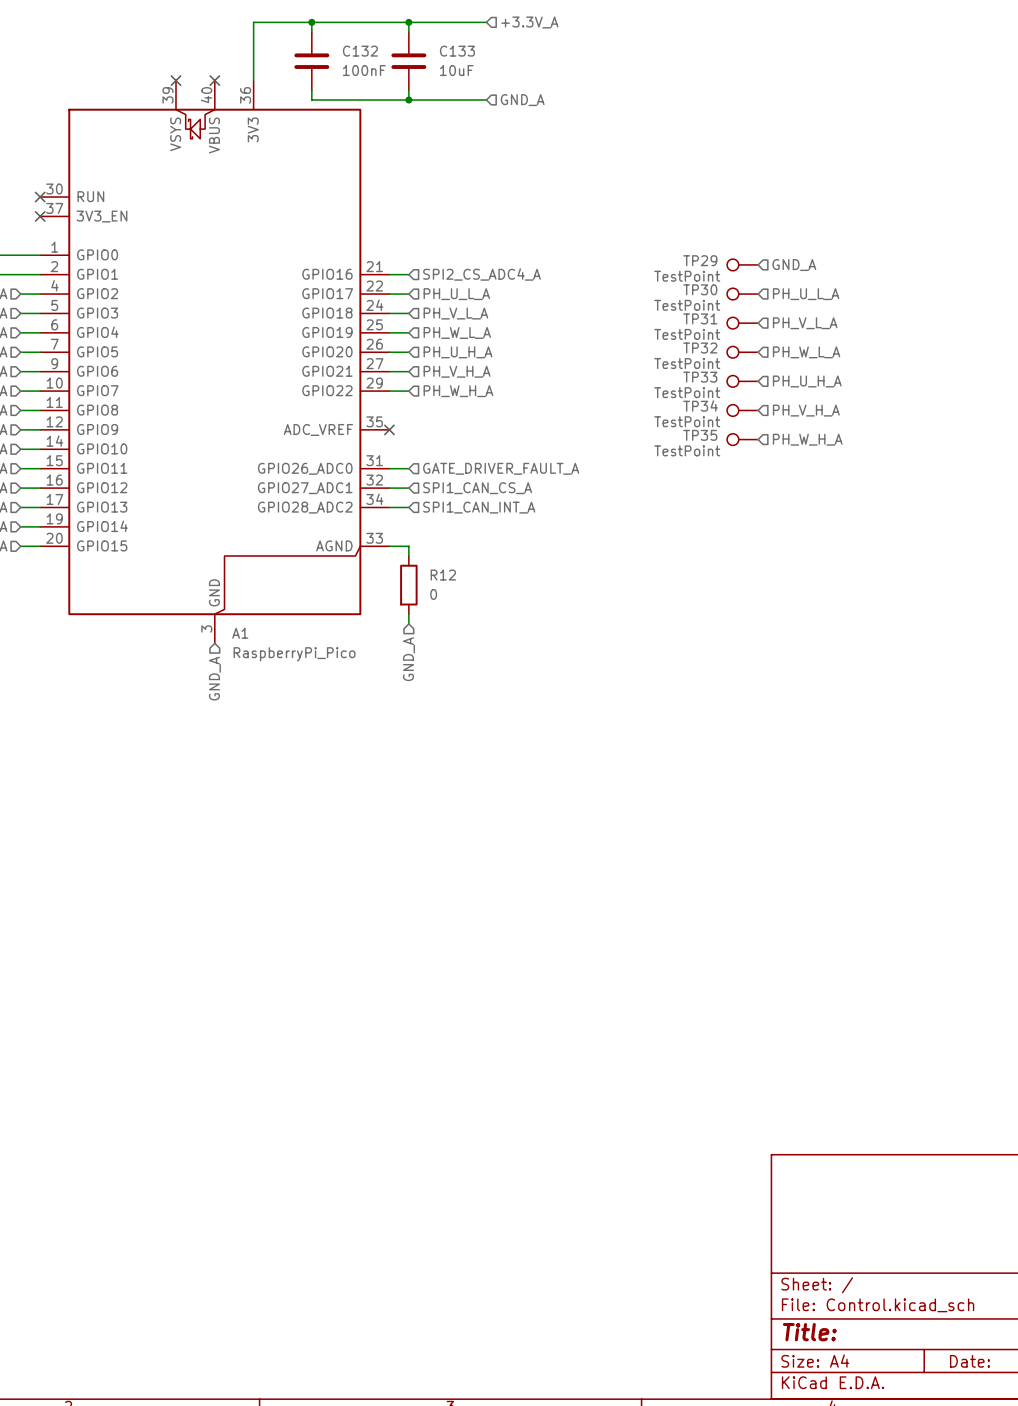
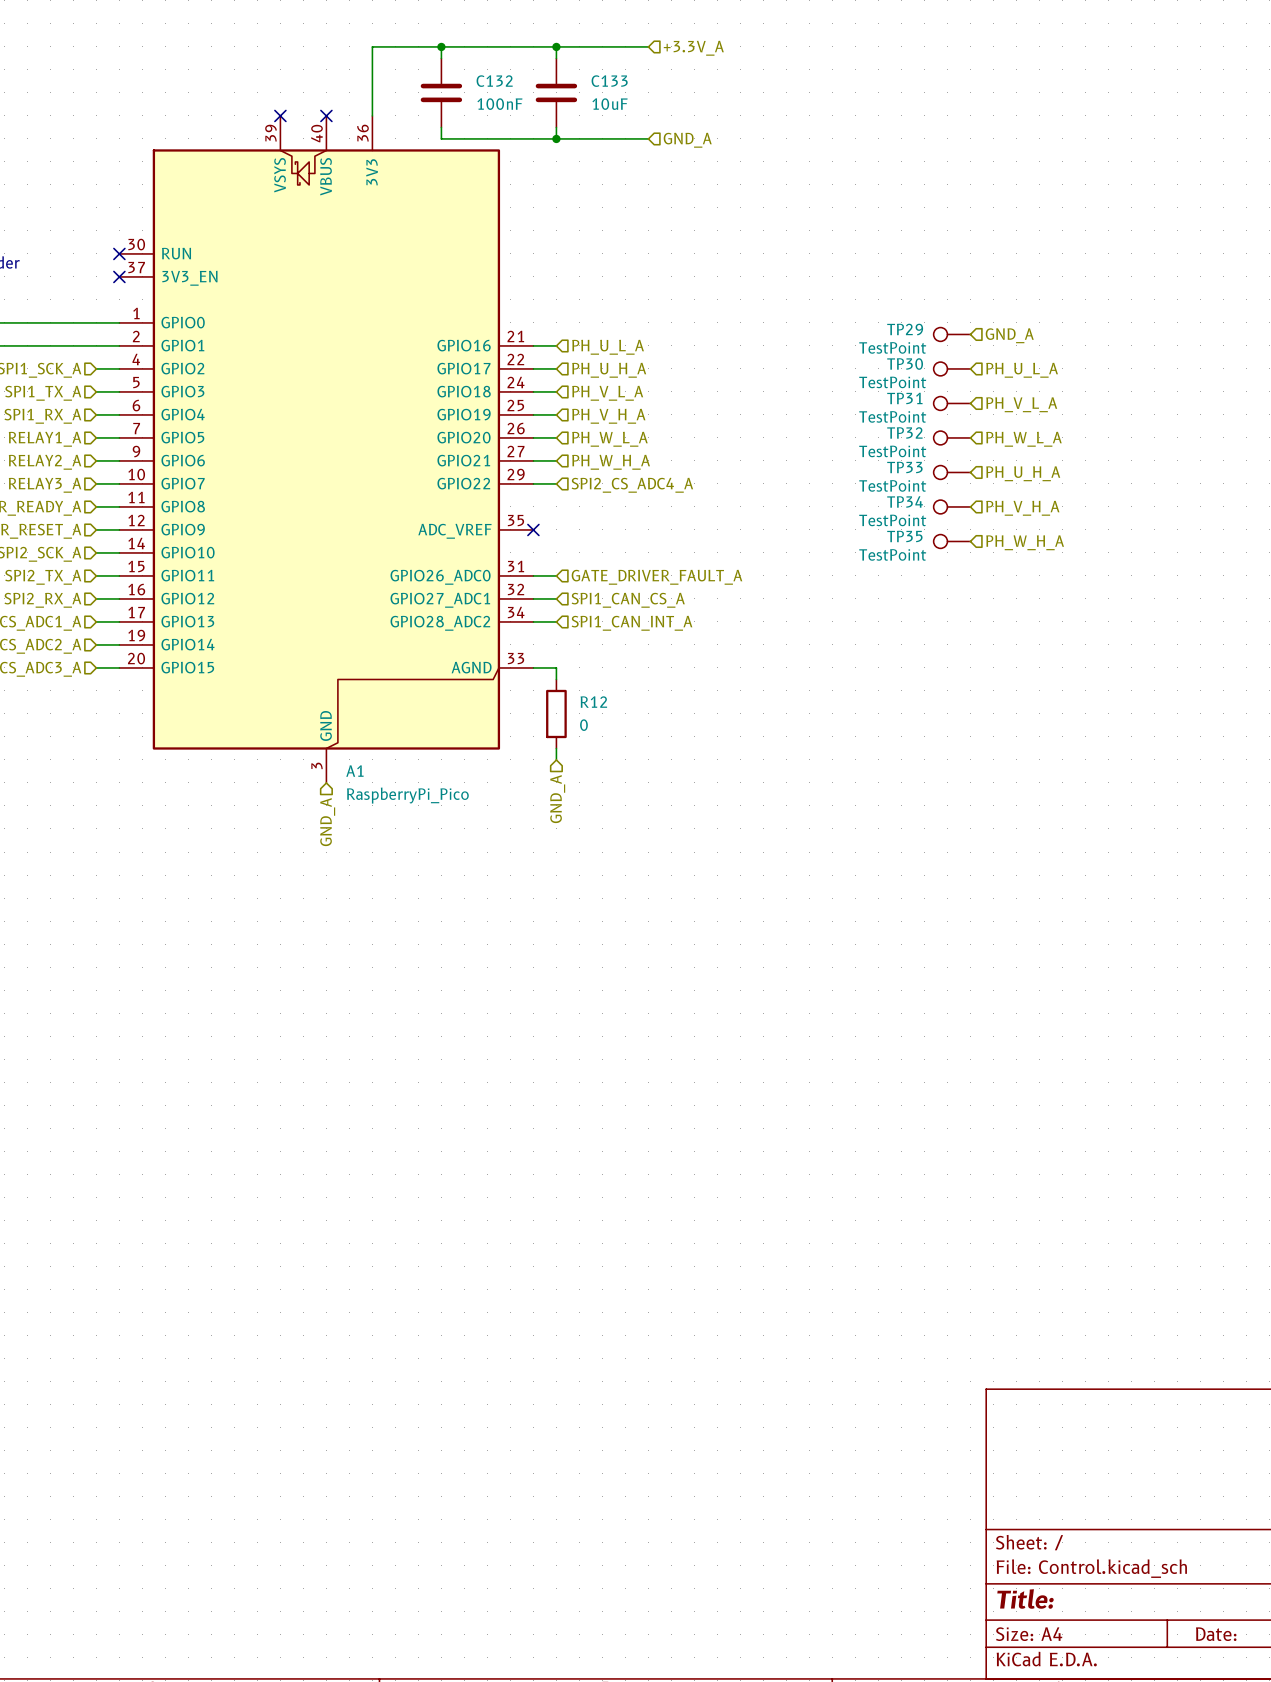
hierarchical label: SPI2_CS_ADC4_A (482, 274) -> PH_U_L_A (608, 347)
hierarchical label: PH_U_L_A (456, 294) -> PH_U_H_A (609, 370)
hierarchical label: PH_W_L_A (457, 332) -> PH_V_H_A (608, 416)
hierarchical label: PH_U_H_A (457, 352) -> PH_W_L_A (609, 439)
hierarchical label: PH_V_H_A (457, 371) -> PH_W_H_A (611, 462)
hierarchical label: PH_W_H_A (458, 391) -> SPI2_CS_ADC4_A (632, 485)

